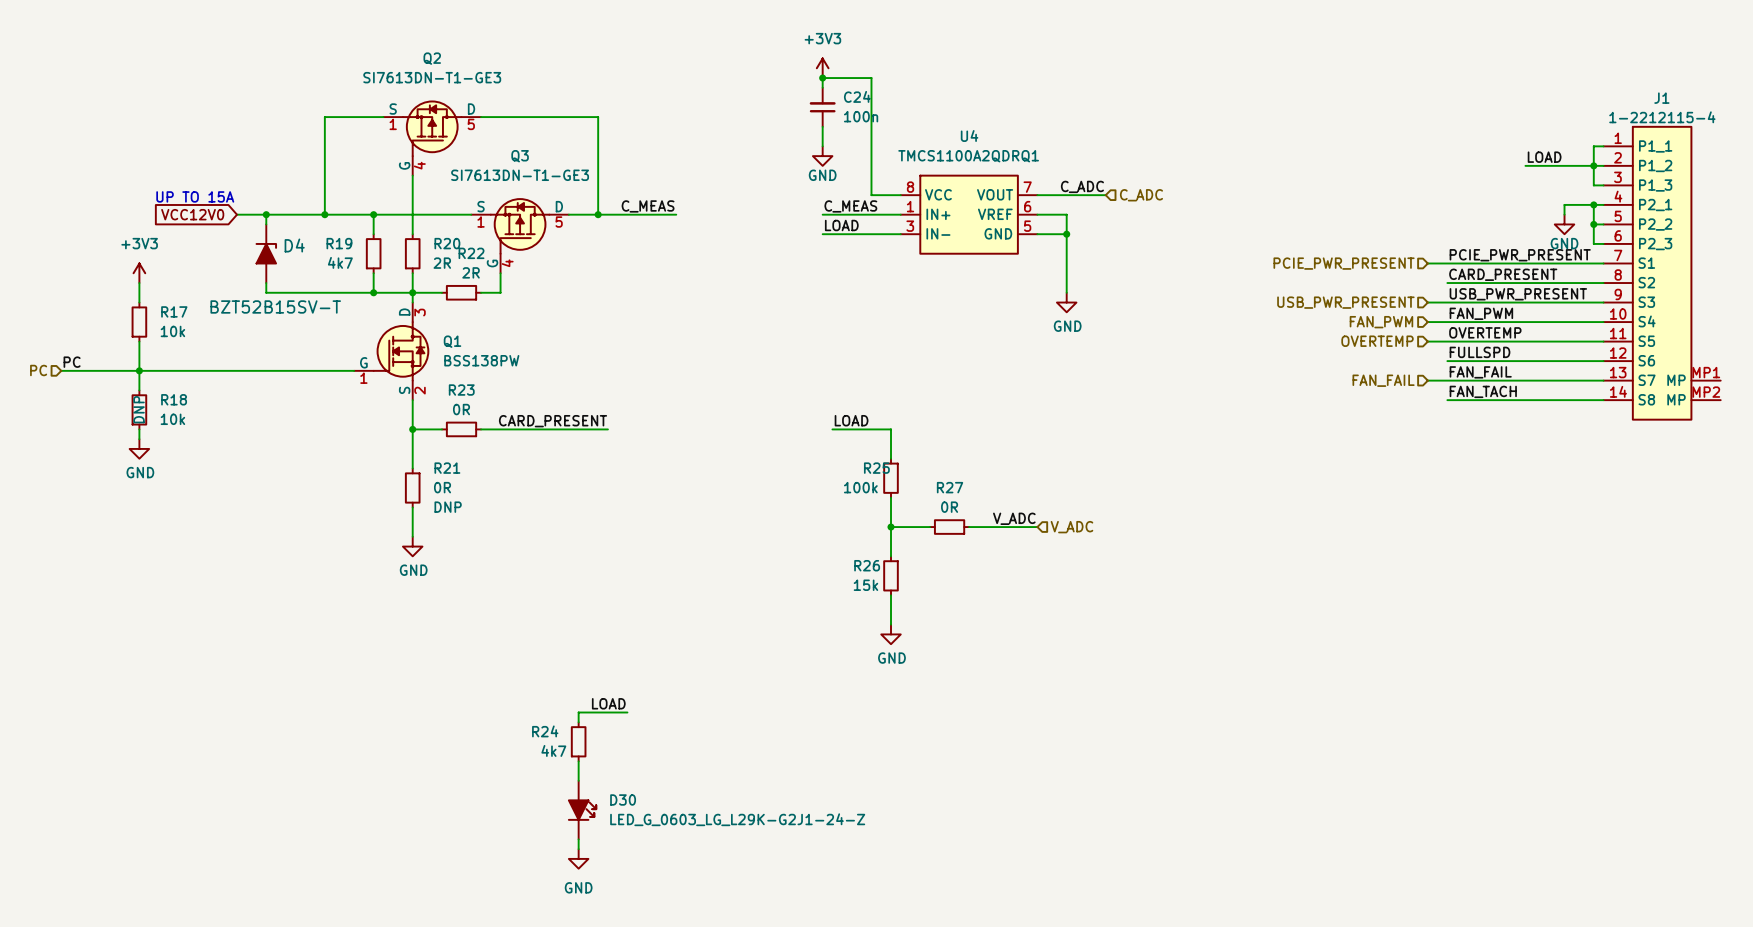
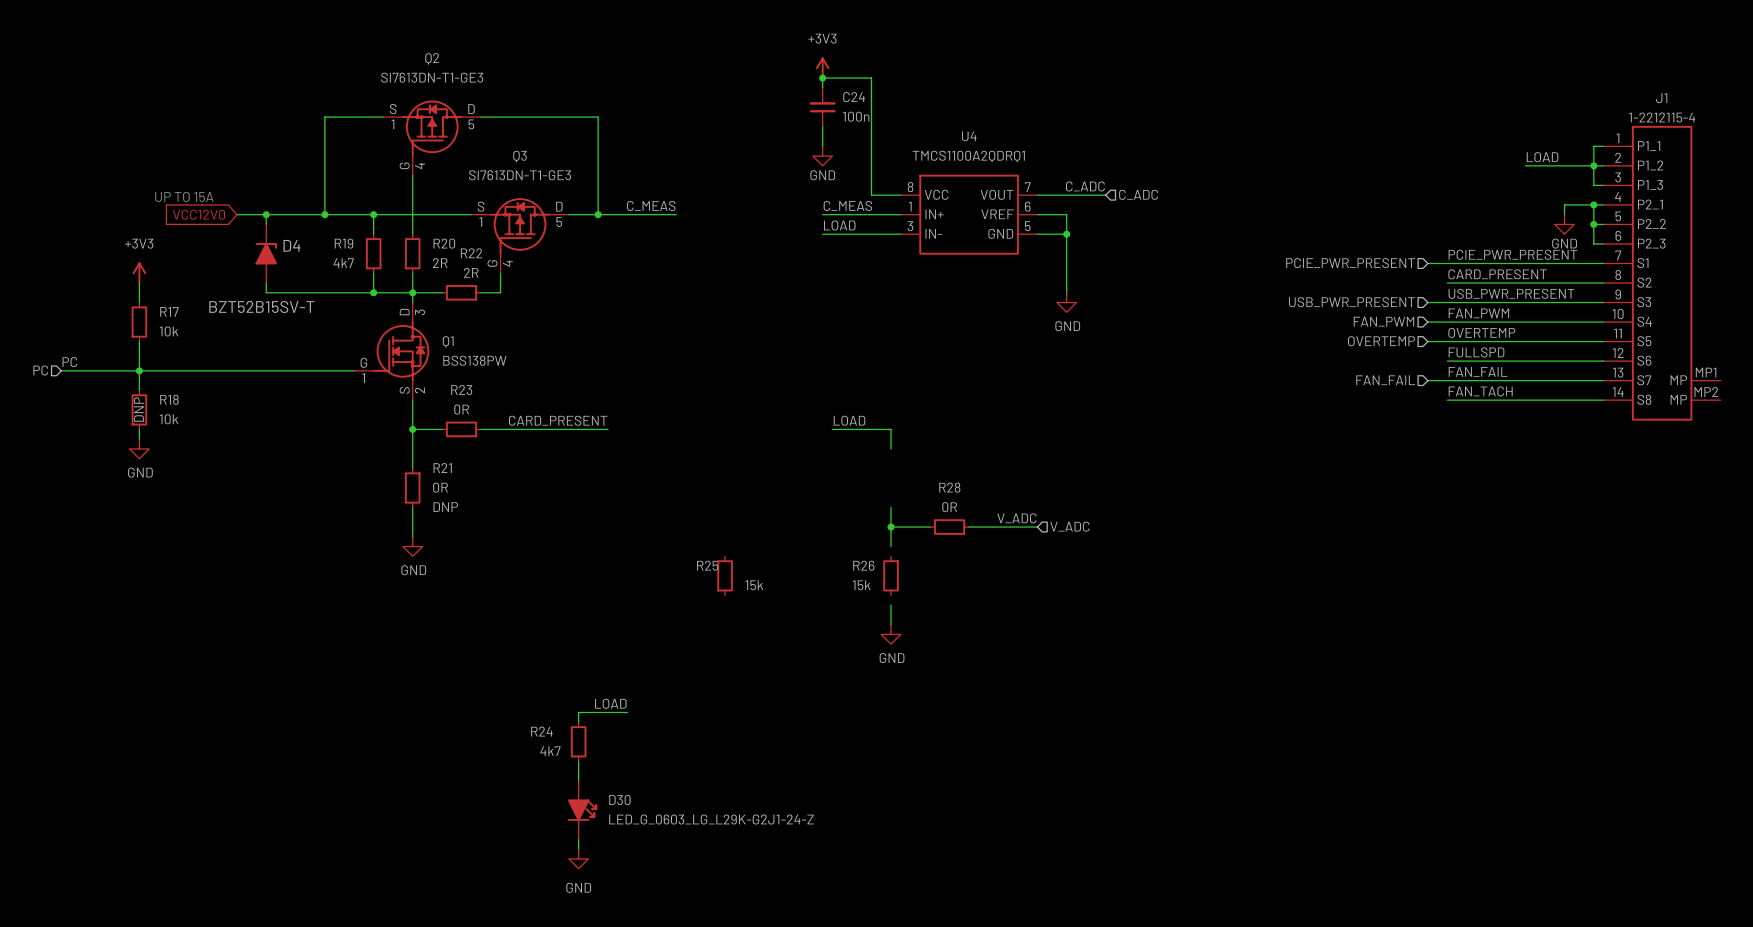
wire: (891, 448) (891, 458) -> none
R25 position: (891, 478) -> (725, 575)
R25 text: 100k (860, 487) -> 15k (754, 585)
R27 name: R27 (950, 487) -> R28 (949, 487)
wire: (891, 497) (891, 507) -> none
wire: (891, 546) (891, 556) -> none
wire: (891, 595) (891, 605) -> none

